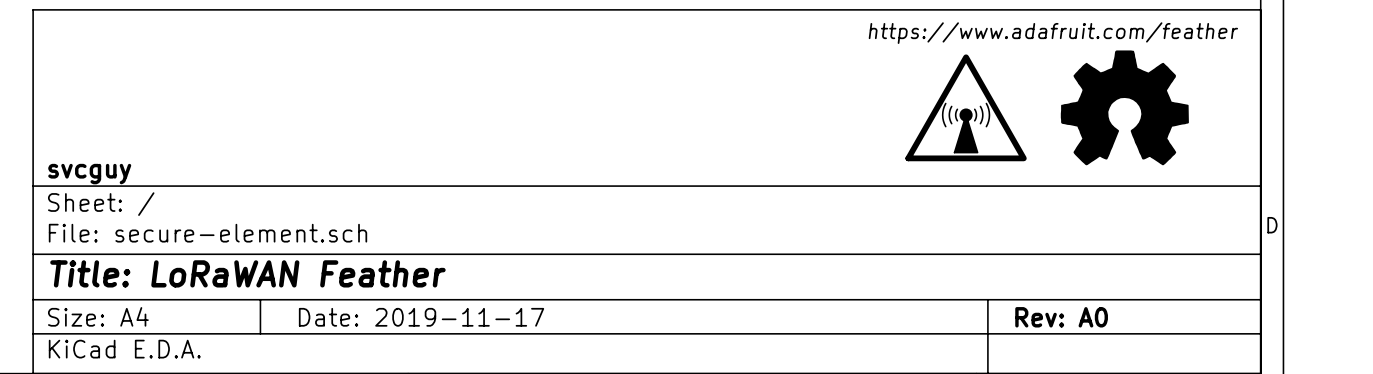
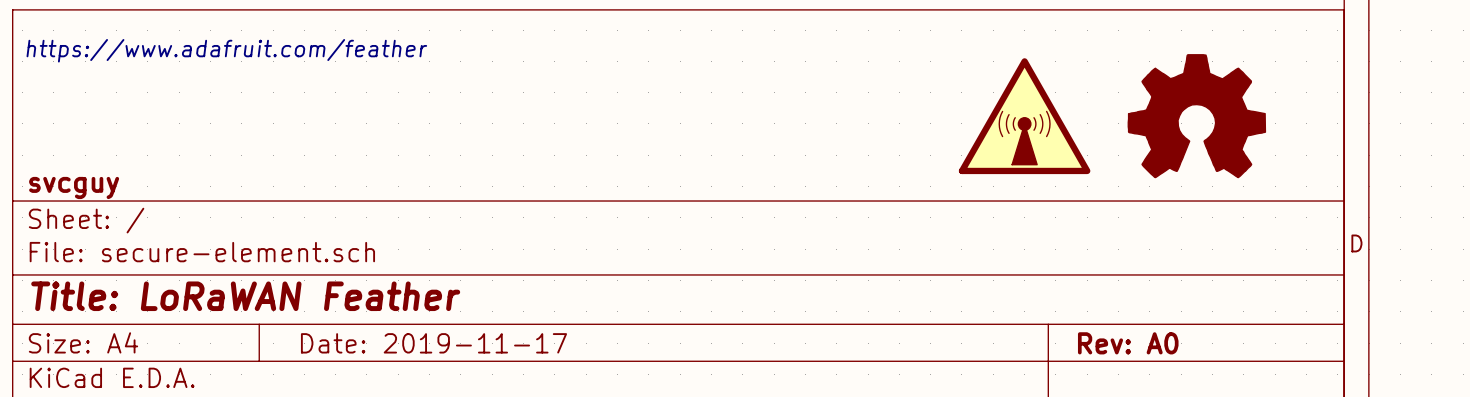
text: https://www.adafruit.com/feather (1053, 33) -> none
text: none -> https://www.adafruit.com/feather (226, 50)

